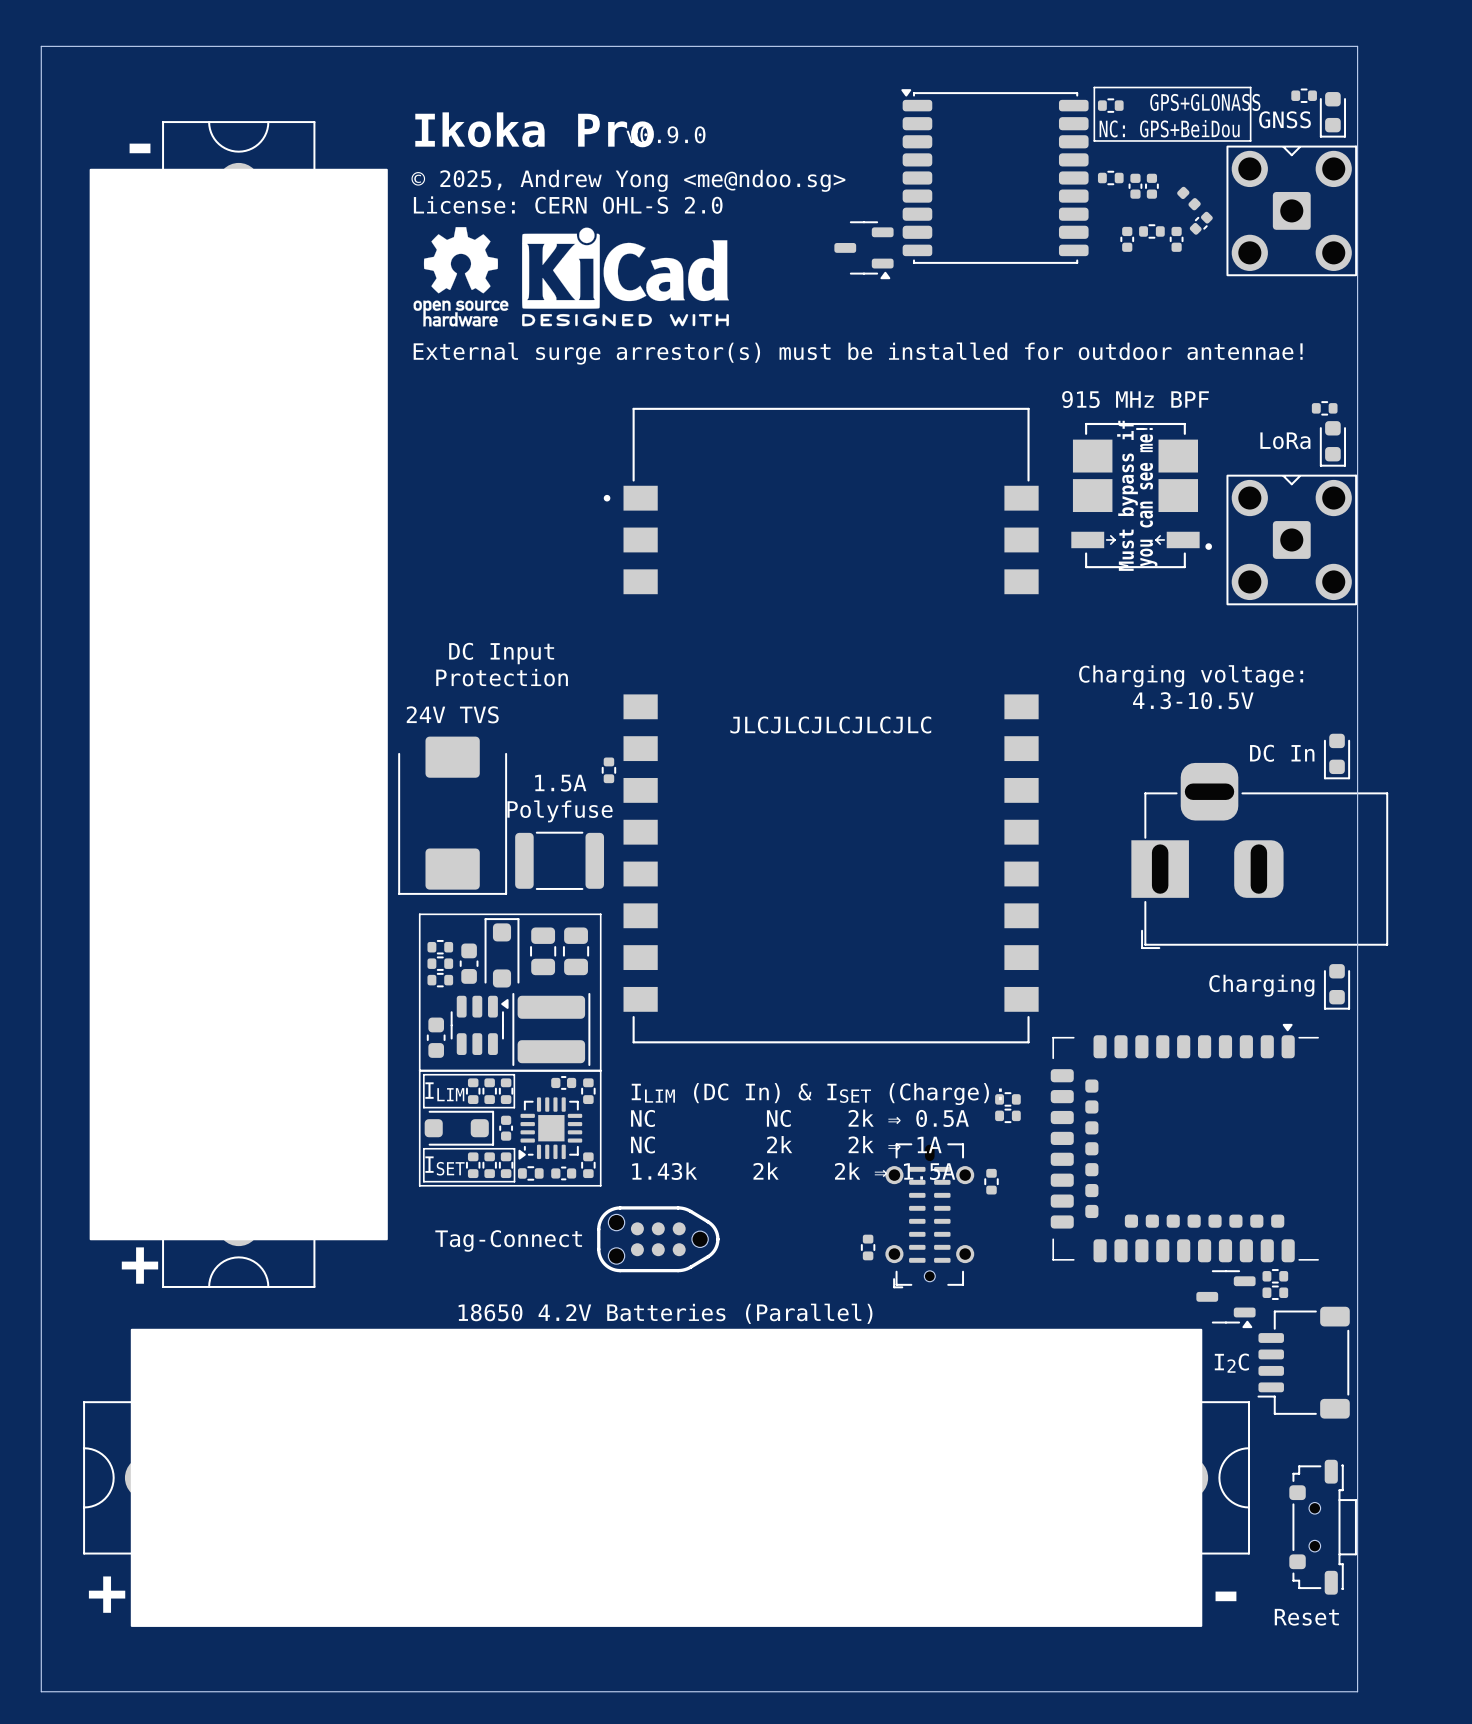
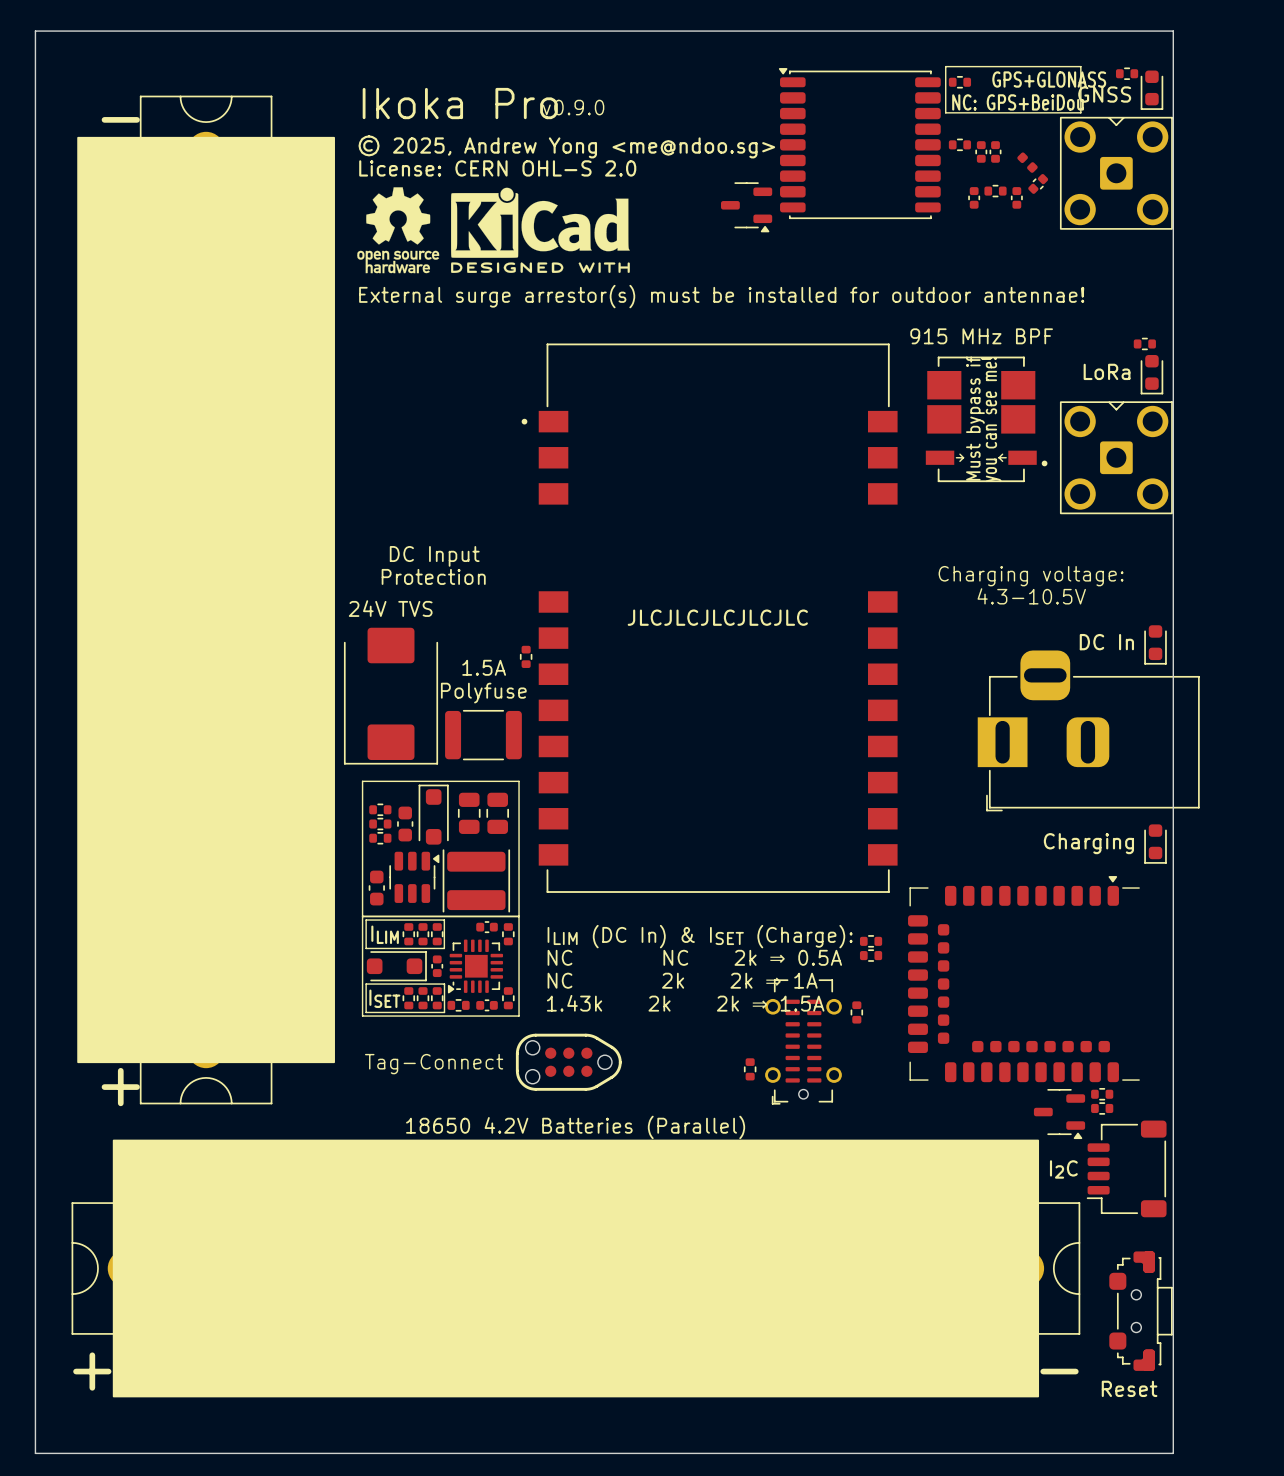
part footprint: [1289, 1459, 1357, 1595] -> [1109, 1251, 1173, 1371]

